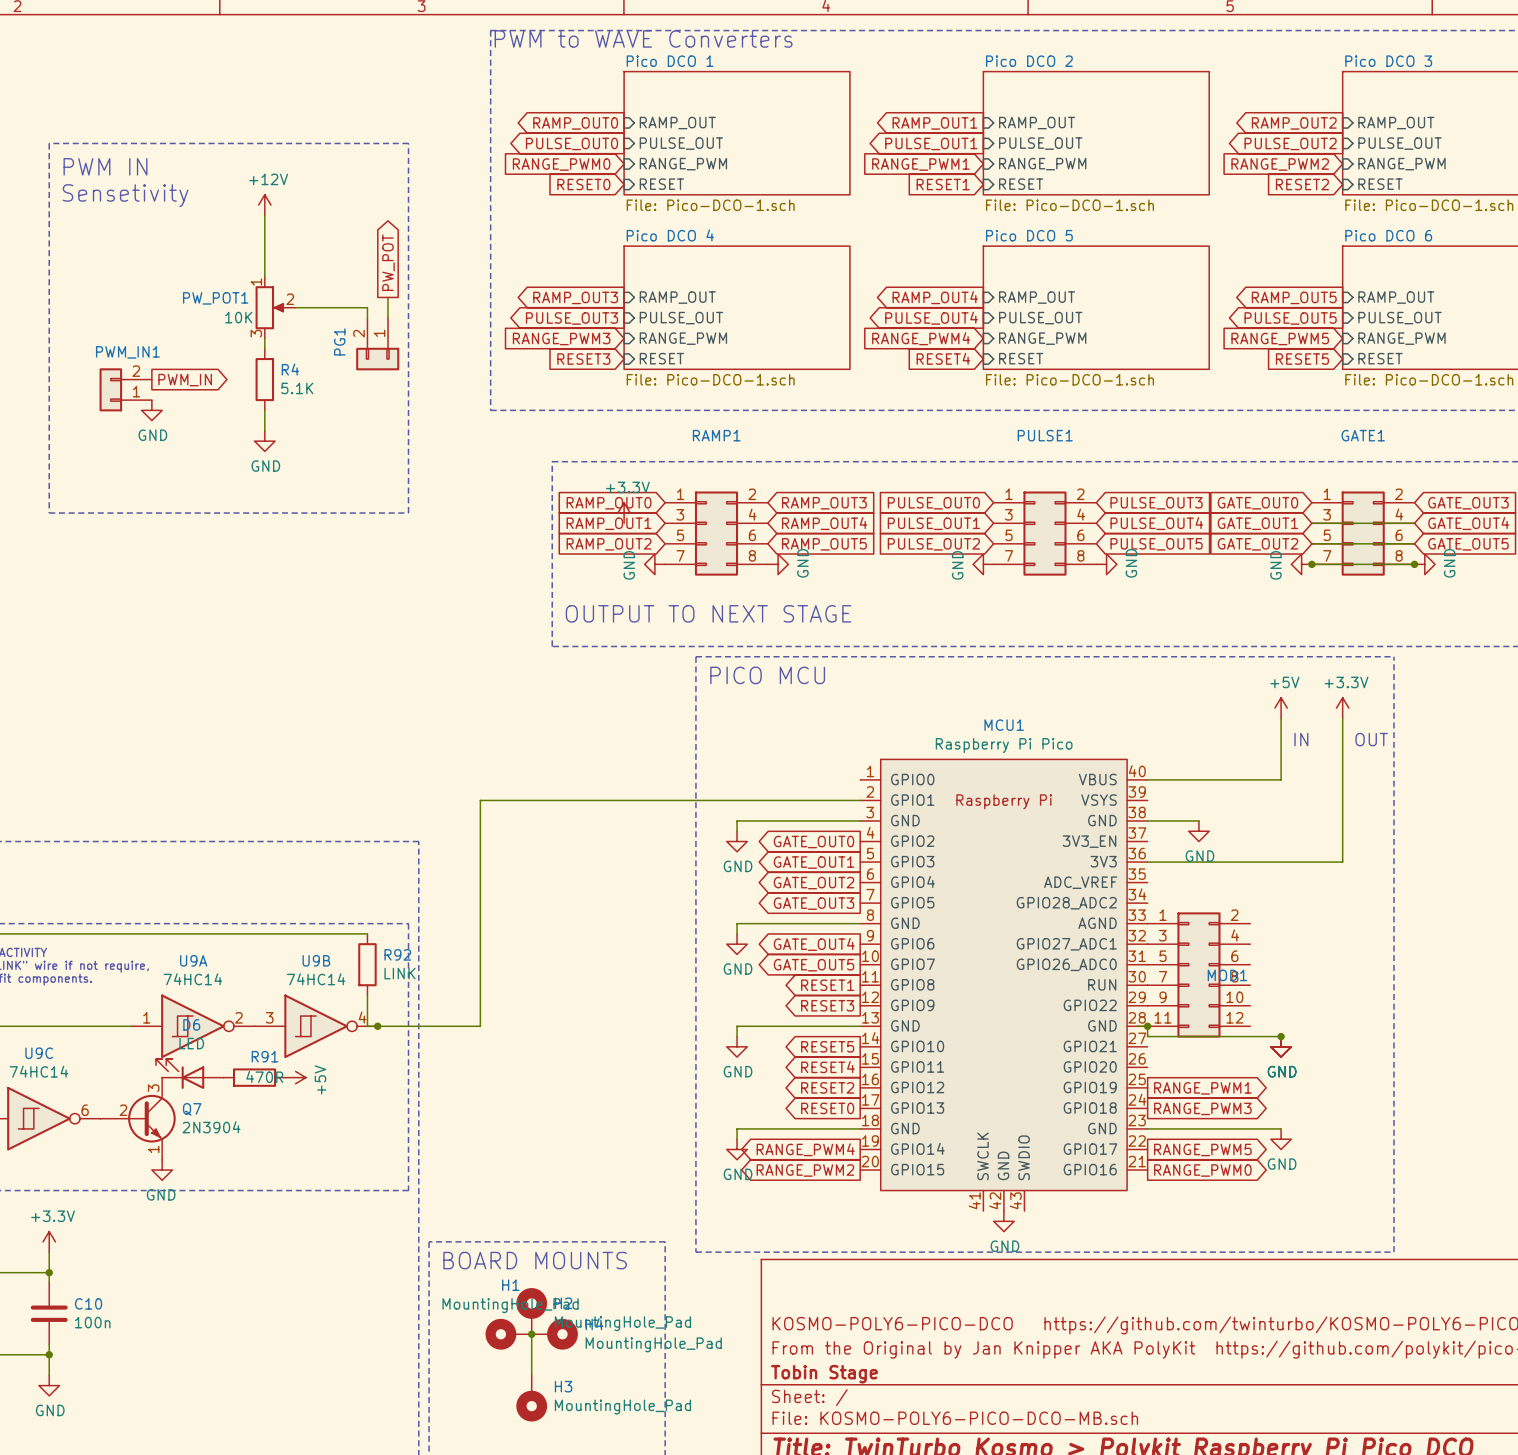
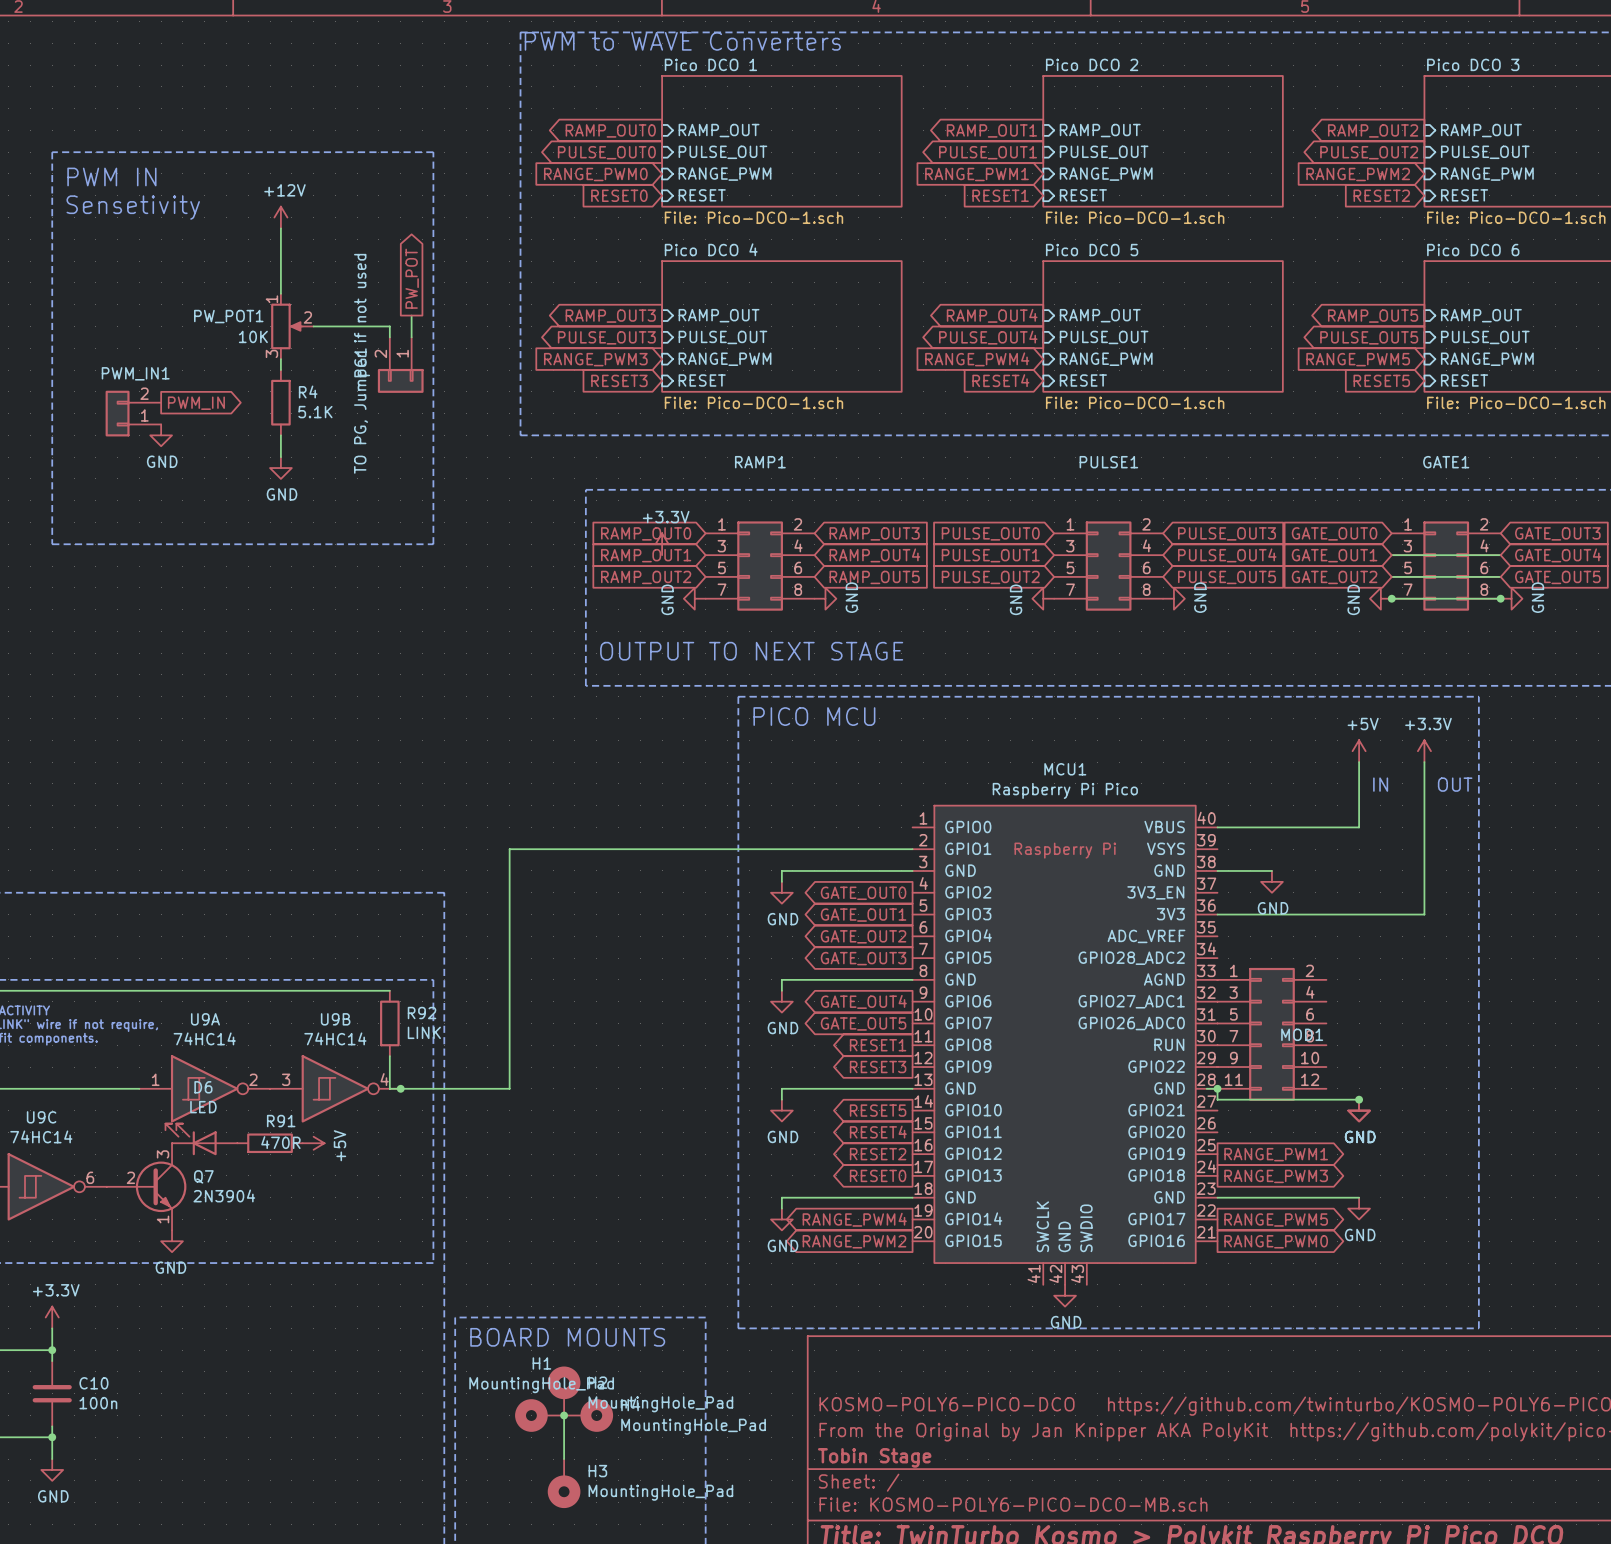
PG1 value: none -> TO PG, Jumper if not used (362, 363)

